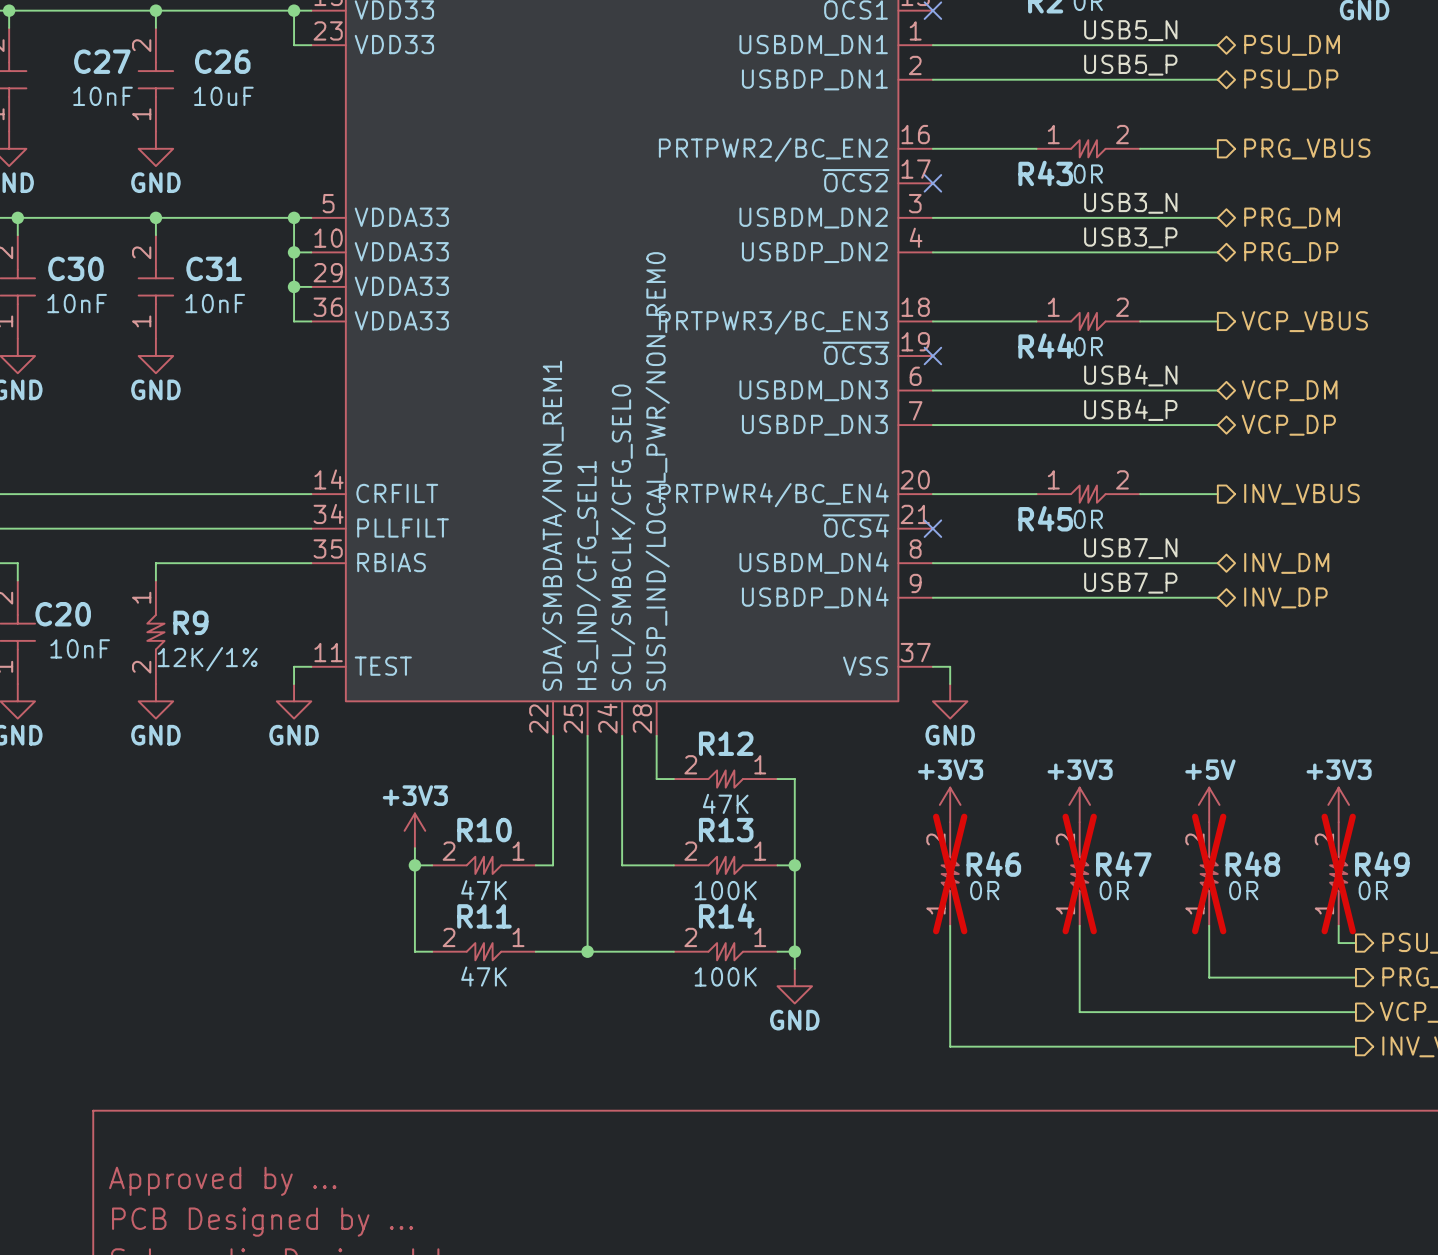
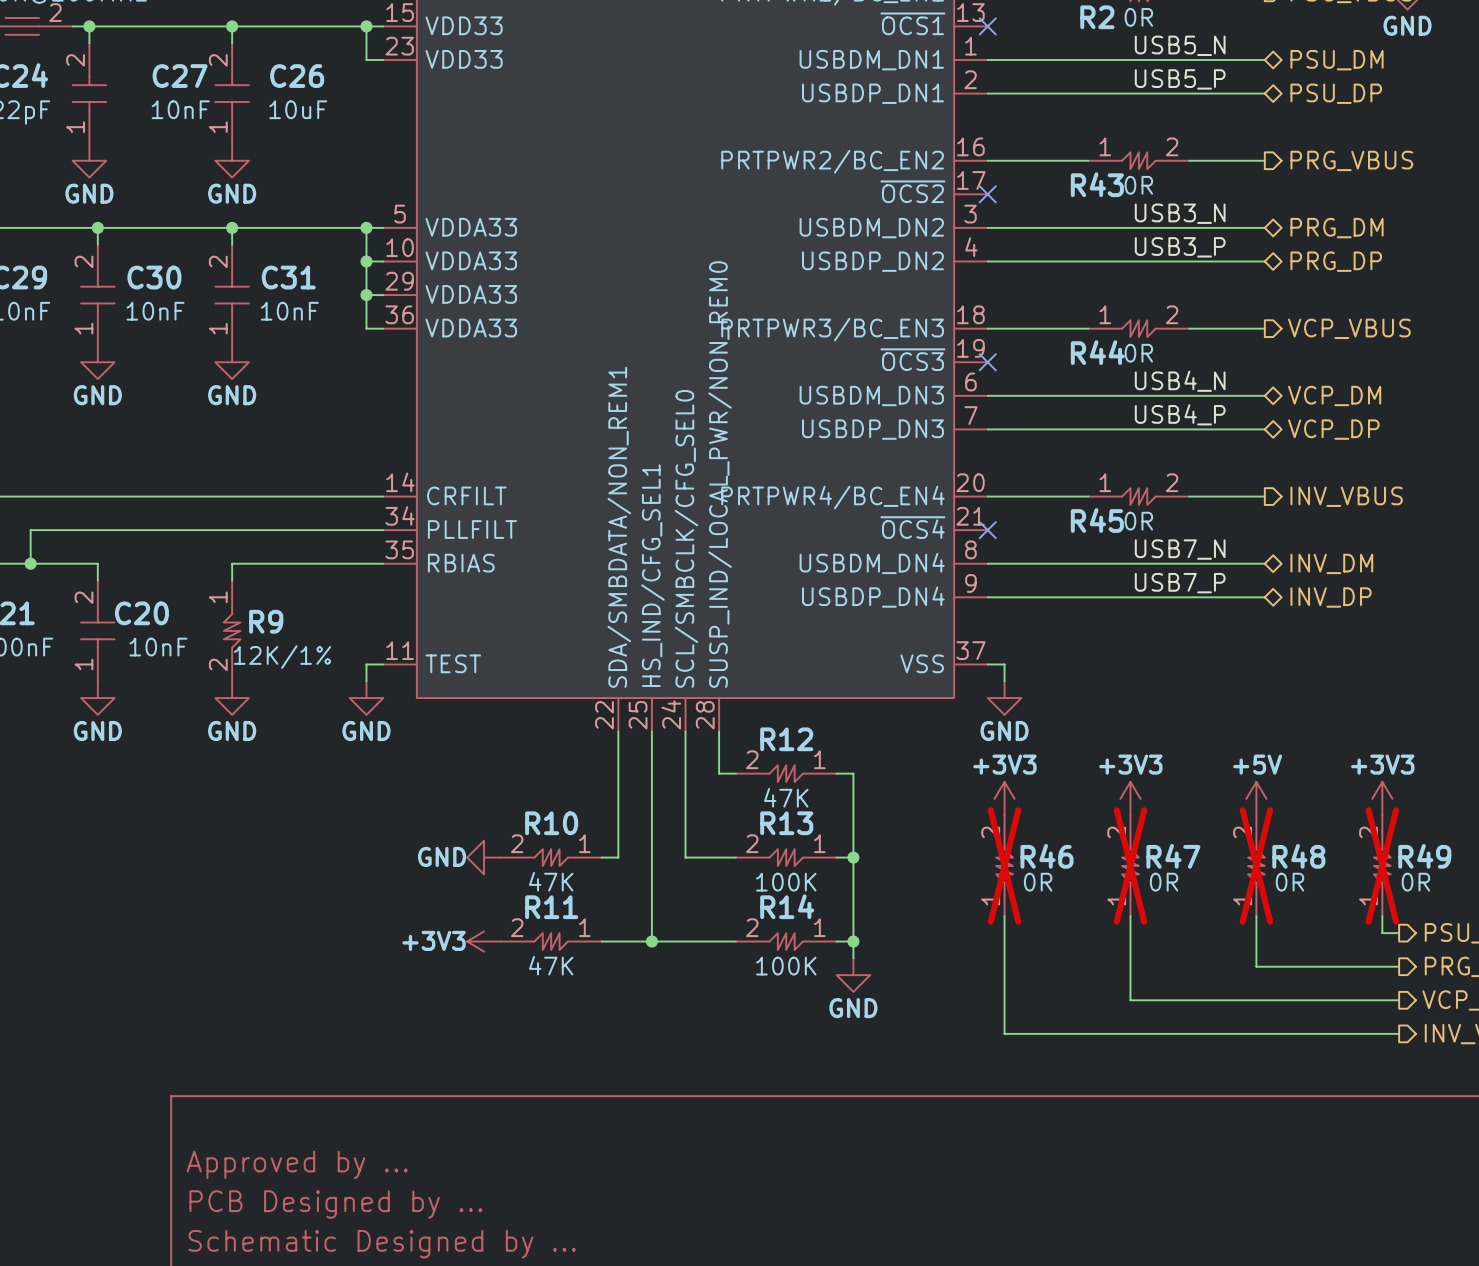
power symbol rotation: 0° (414, 830) -> 90° counterclockwise (484, 941)
power symbol position: +3V3 (414, 830) -> +3V3 (484, 941)
wire: (414, 848) (414, 951) (432, 951) -> none
junction: (414, 865) -> none
power symbol: none -> GND (484, 857)

